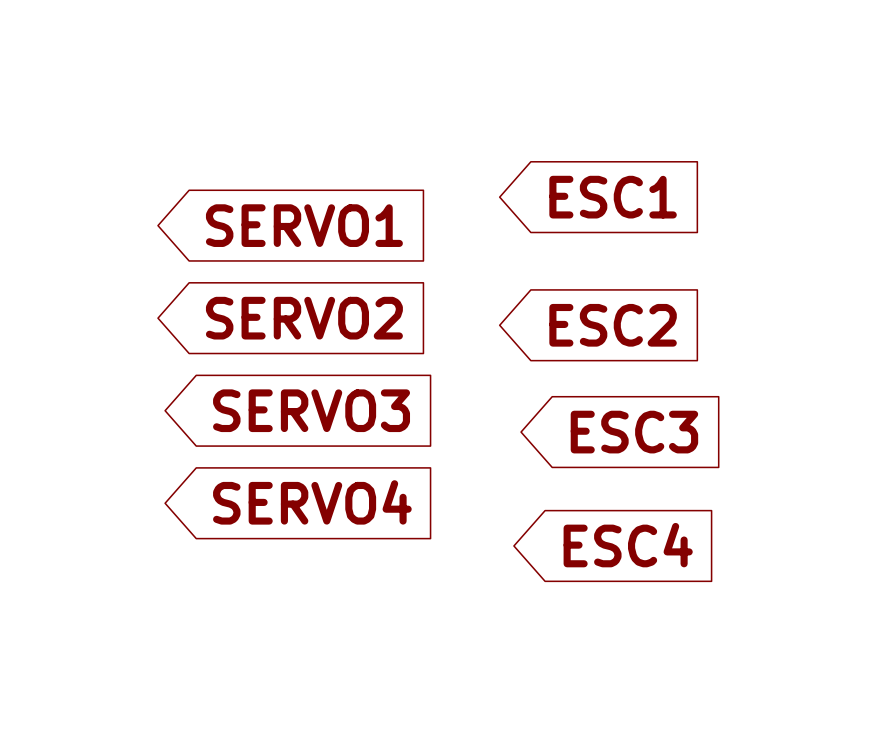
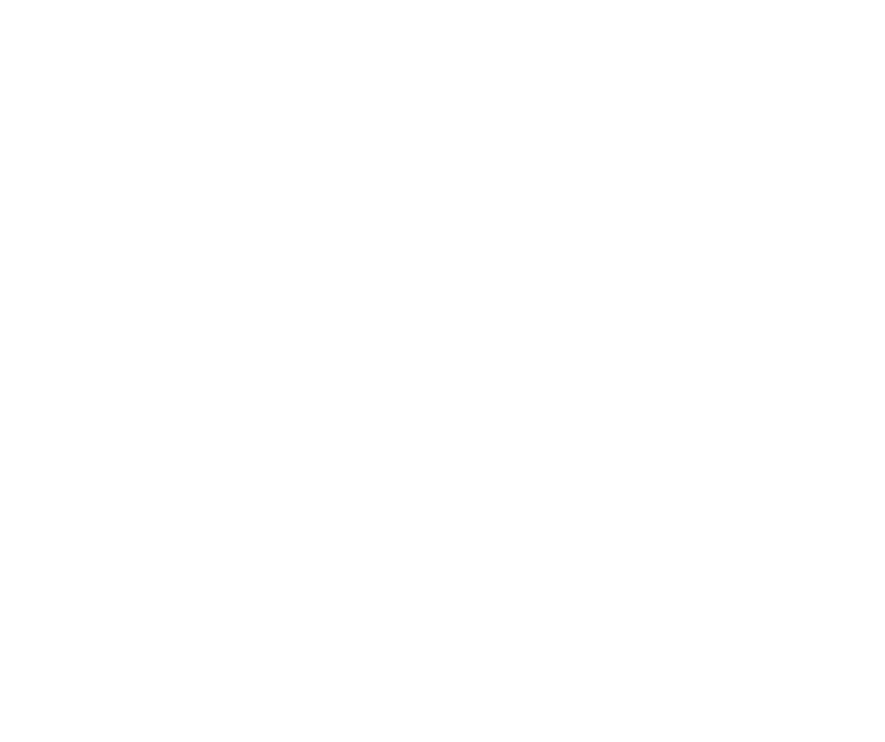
global label: ESC1 (613, 197) -> none
global label: SERVO1 (304, 225) -> none
global label: SERVO2 (304, 318) -> none
global label: ESC2 (613, 325) -> none
global label: SERVO3 (311, 410) -> none
global label: ESC3 (634, 432) -> none
global label: SERVO4 (312, 502) -> none
global label: ESC4 (628, 545) -> none

